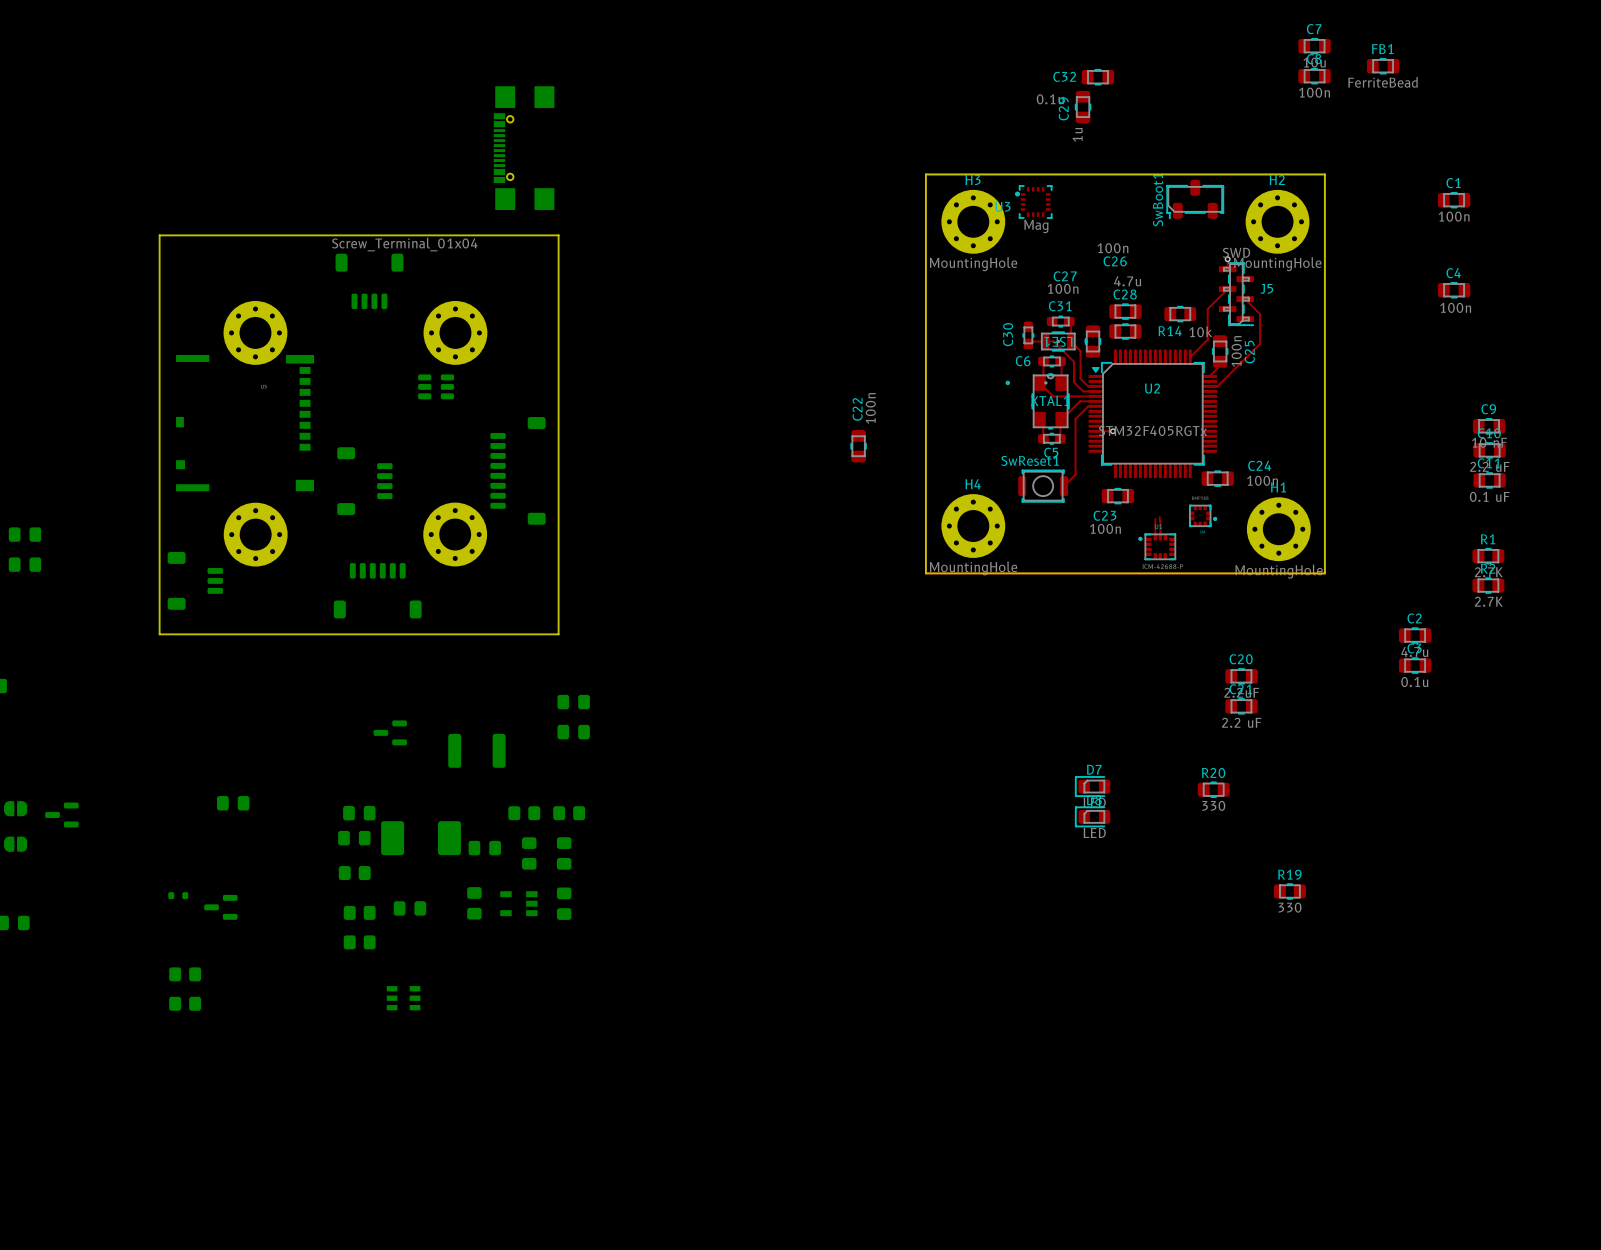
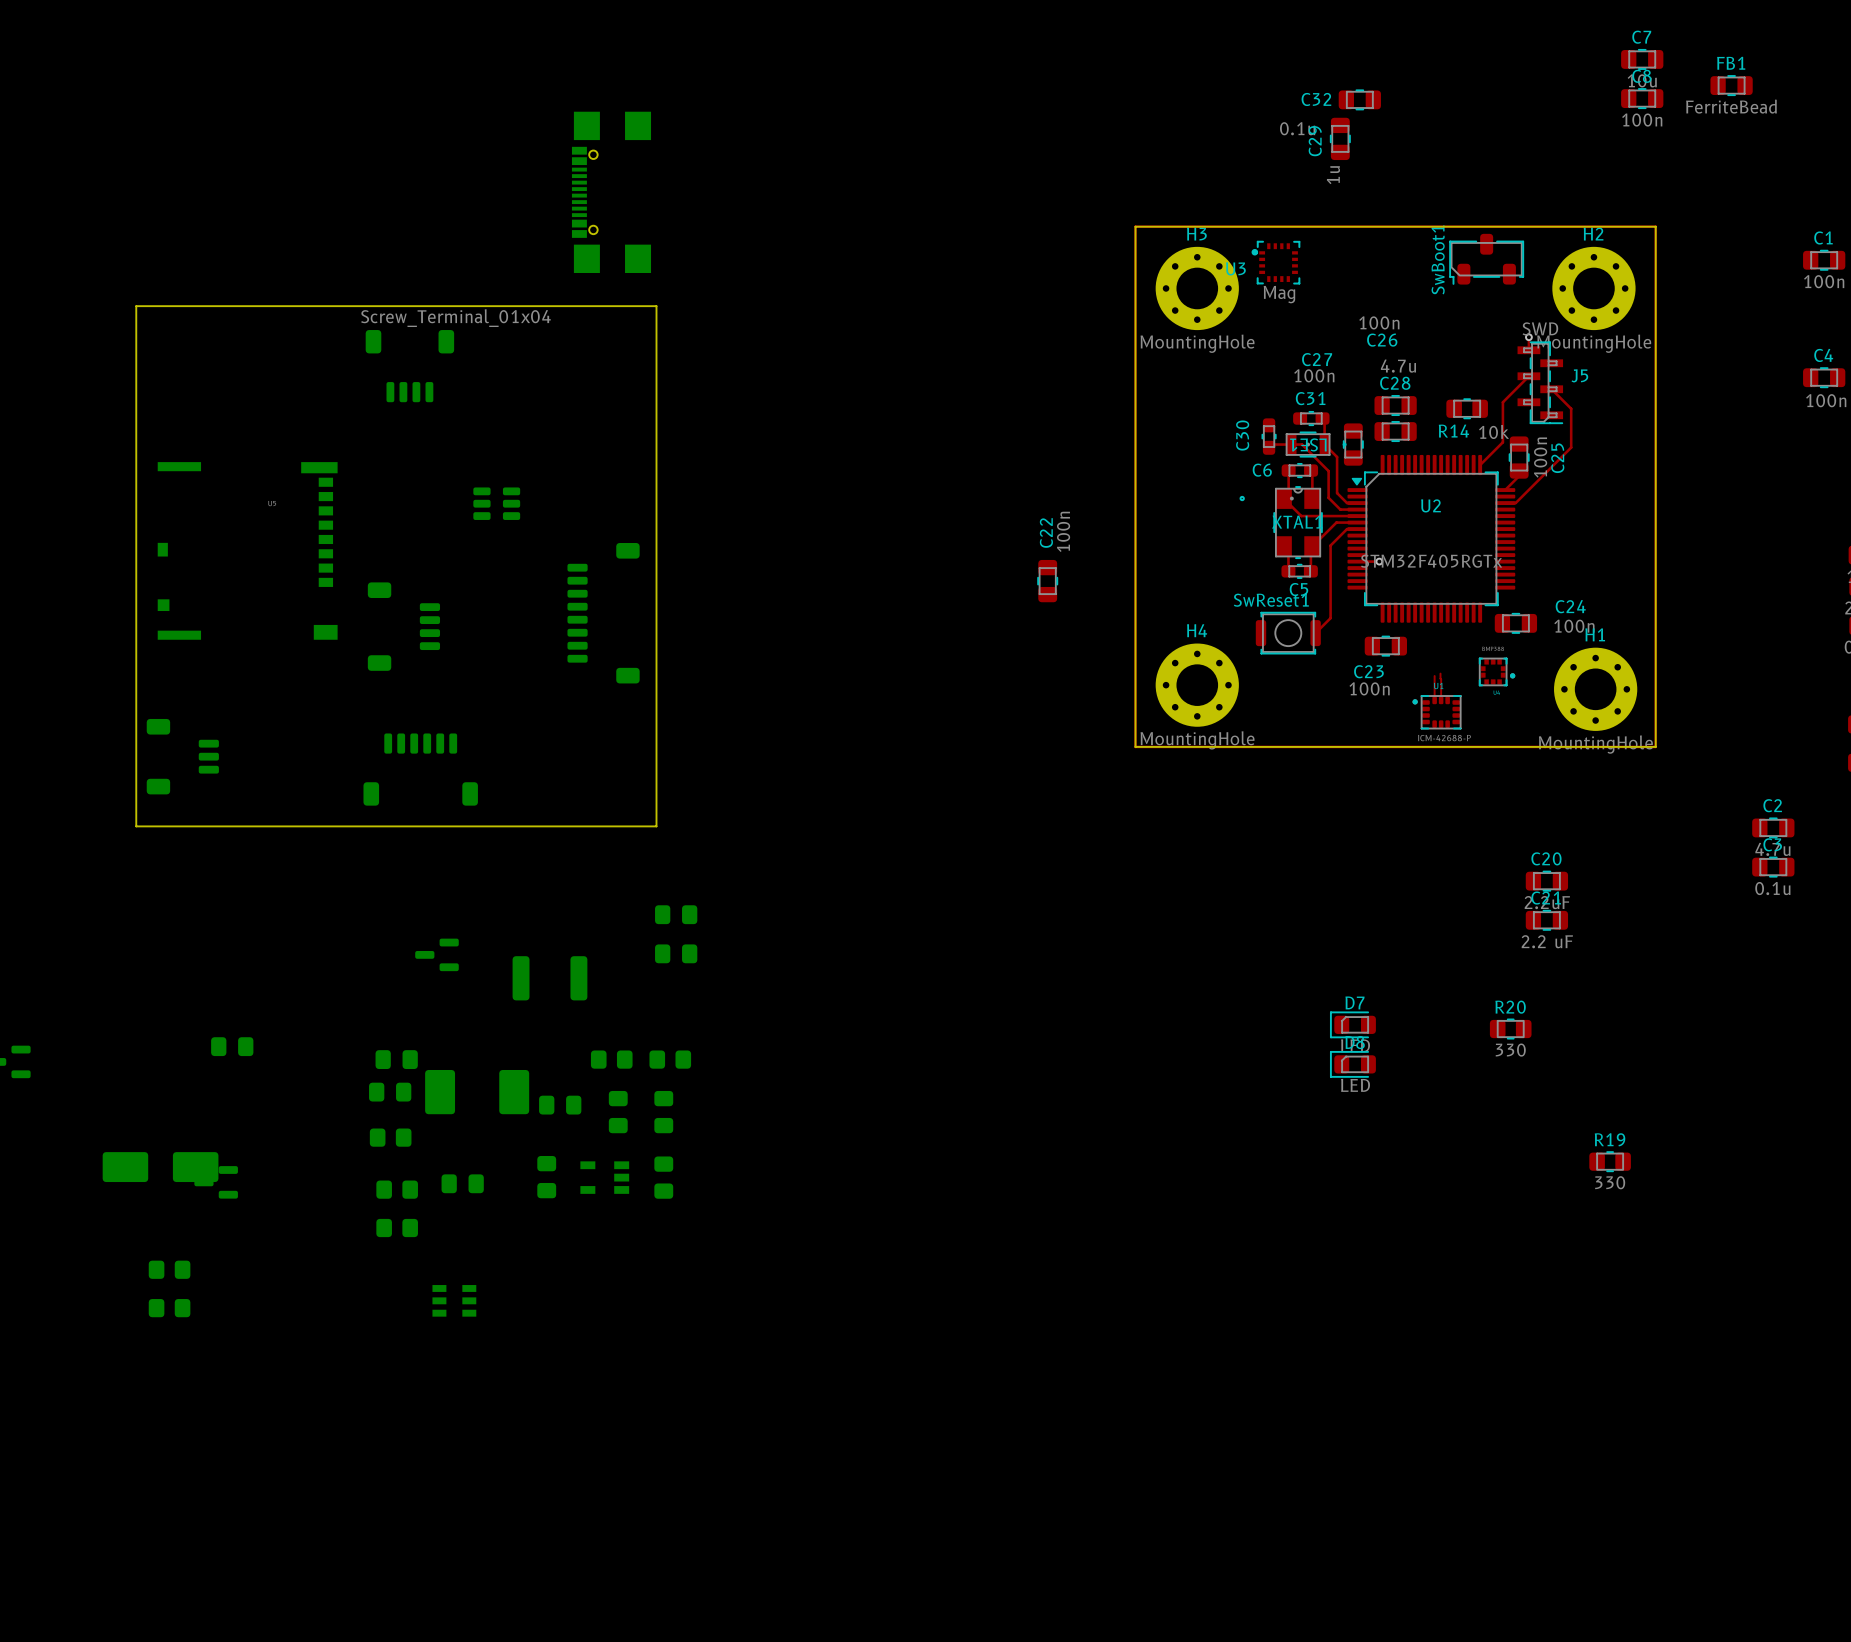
part: (255, 332) -> none
part: (455, 332) -> none
part: (255, 534) -> none
part: (455, 534) -> none
part footprint: [168, 892, 189, 900] -> [102, 1152, 219, 1183]

